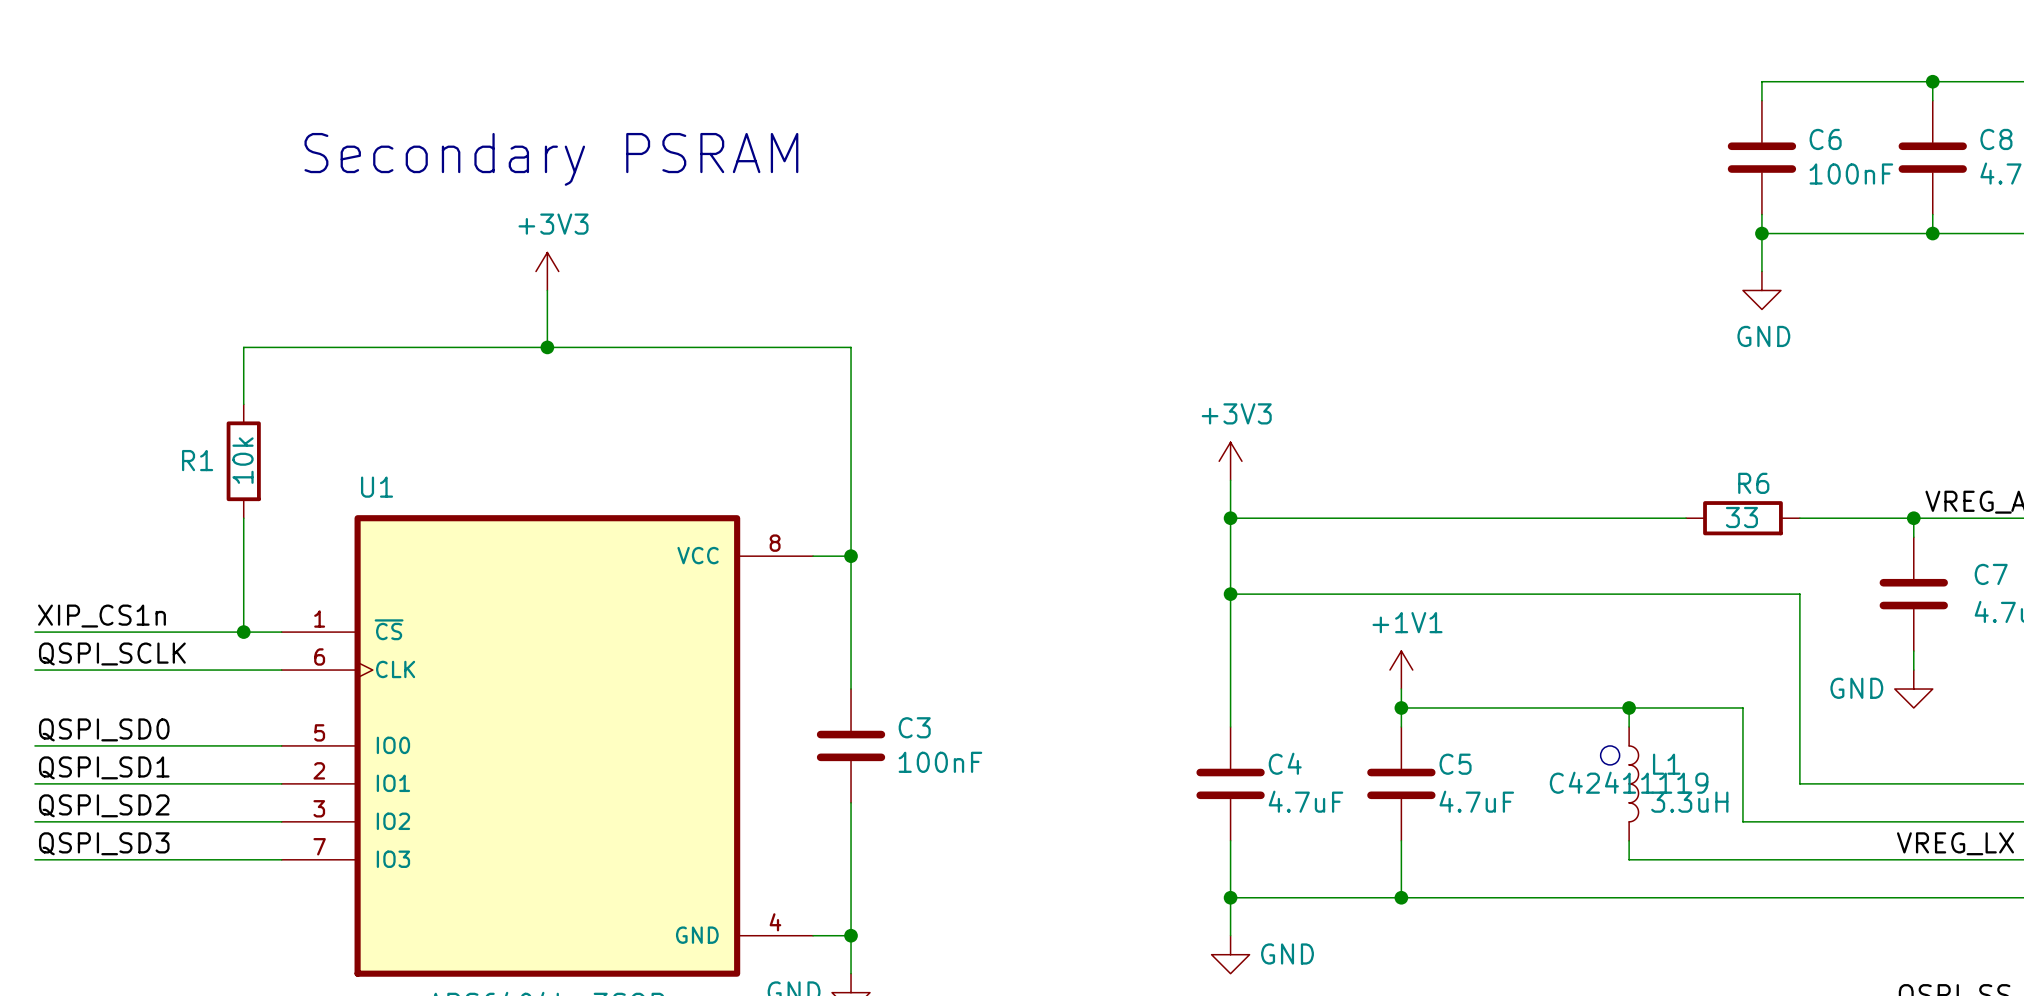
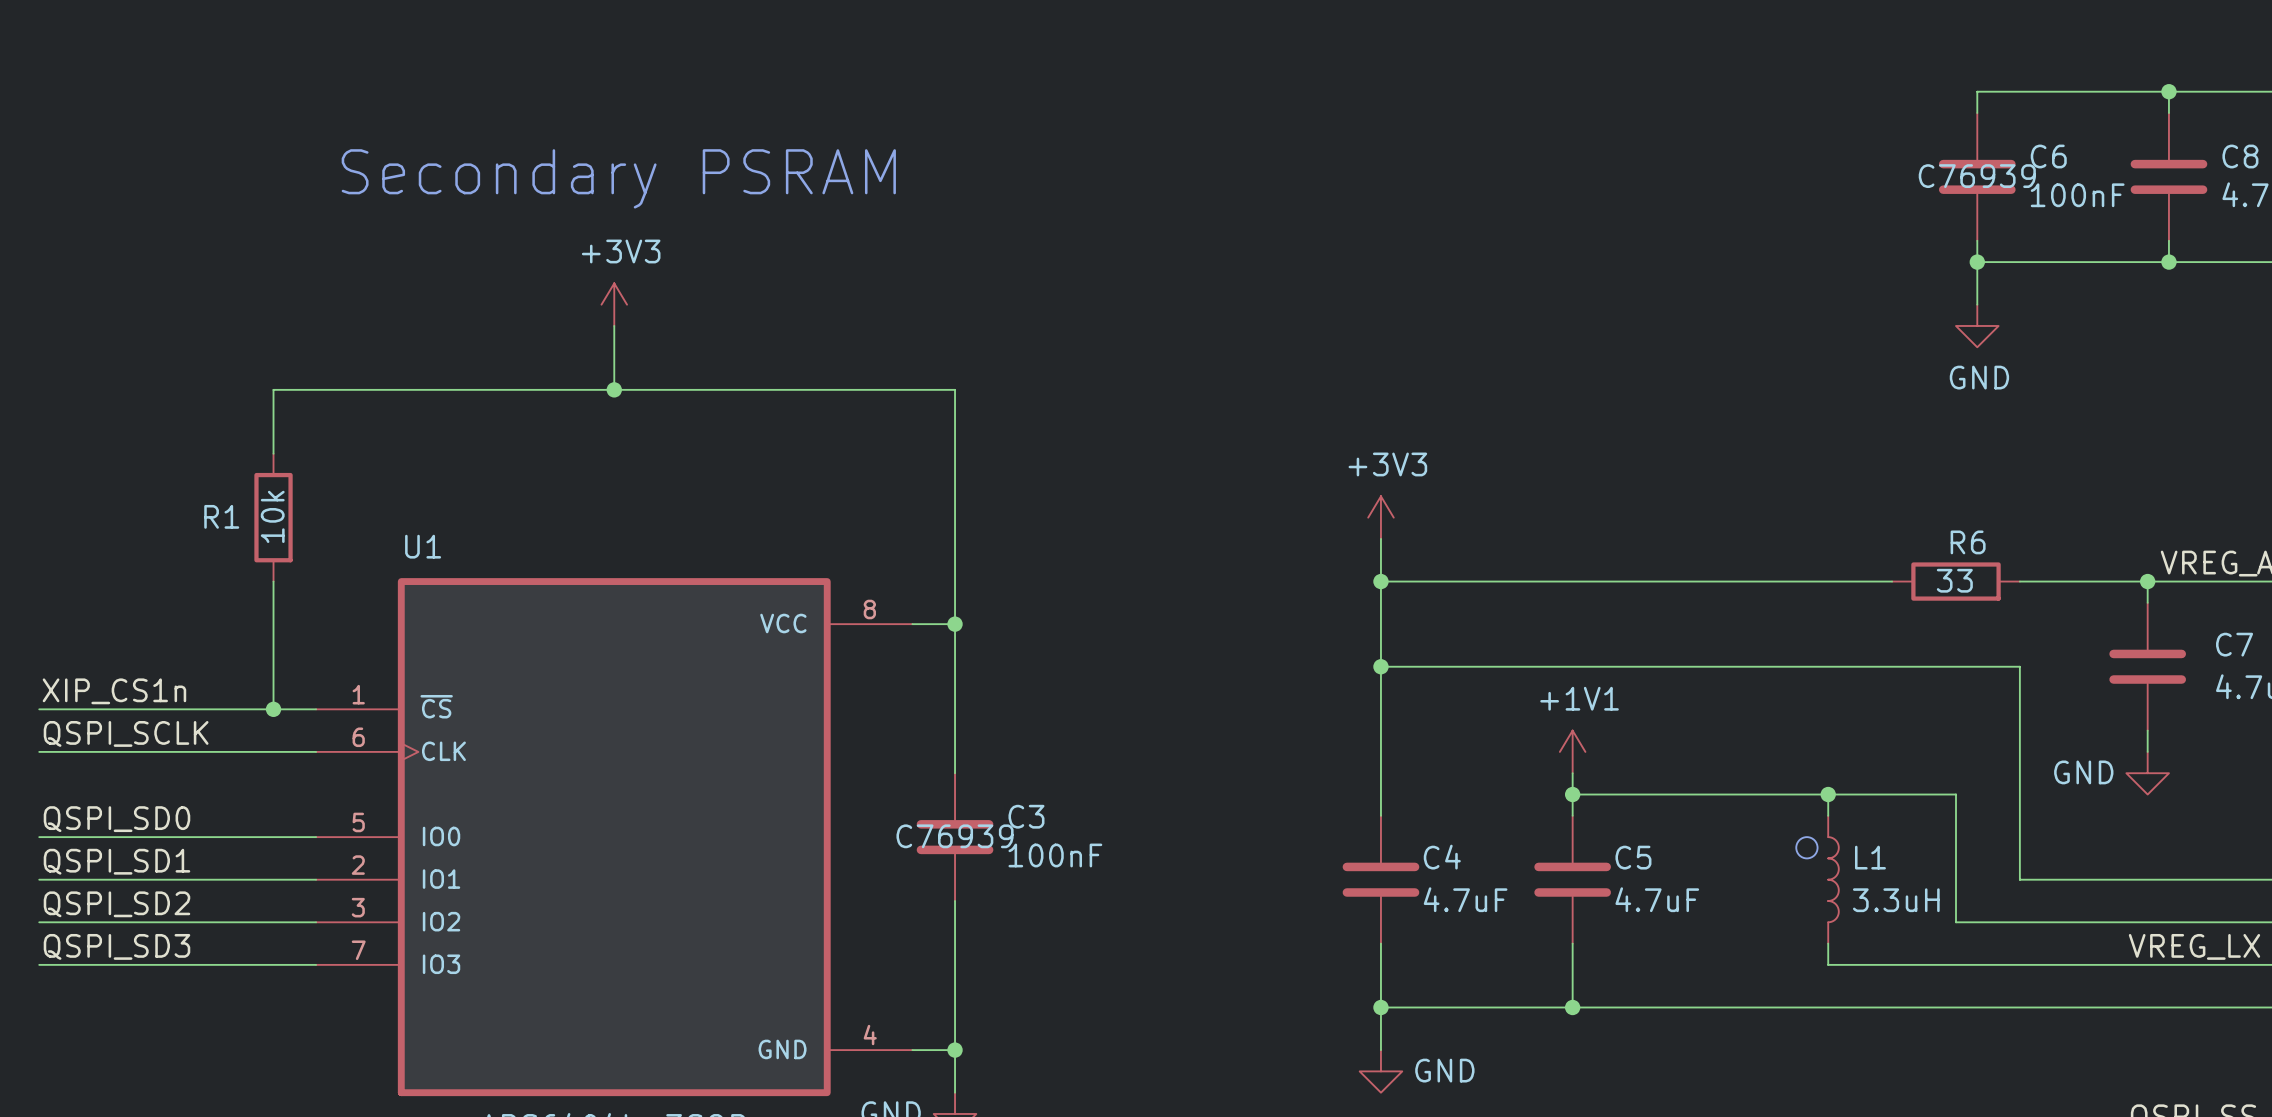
C6 text: none -> C76939 (1977, 176)
C3 text: none -> C76939 (955, 836)
L1 text: C42411119 (1629, 782) -> none

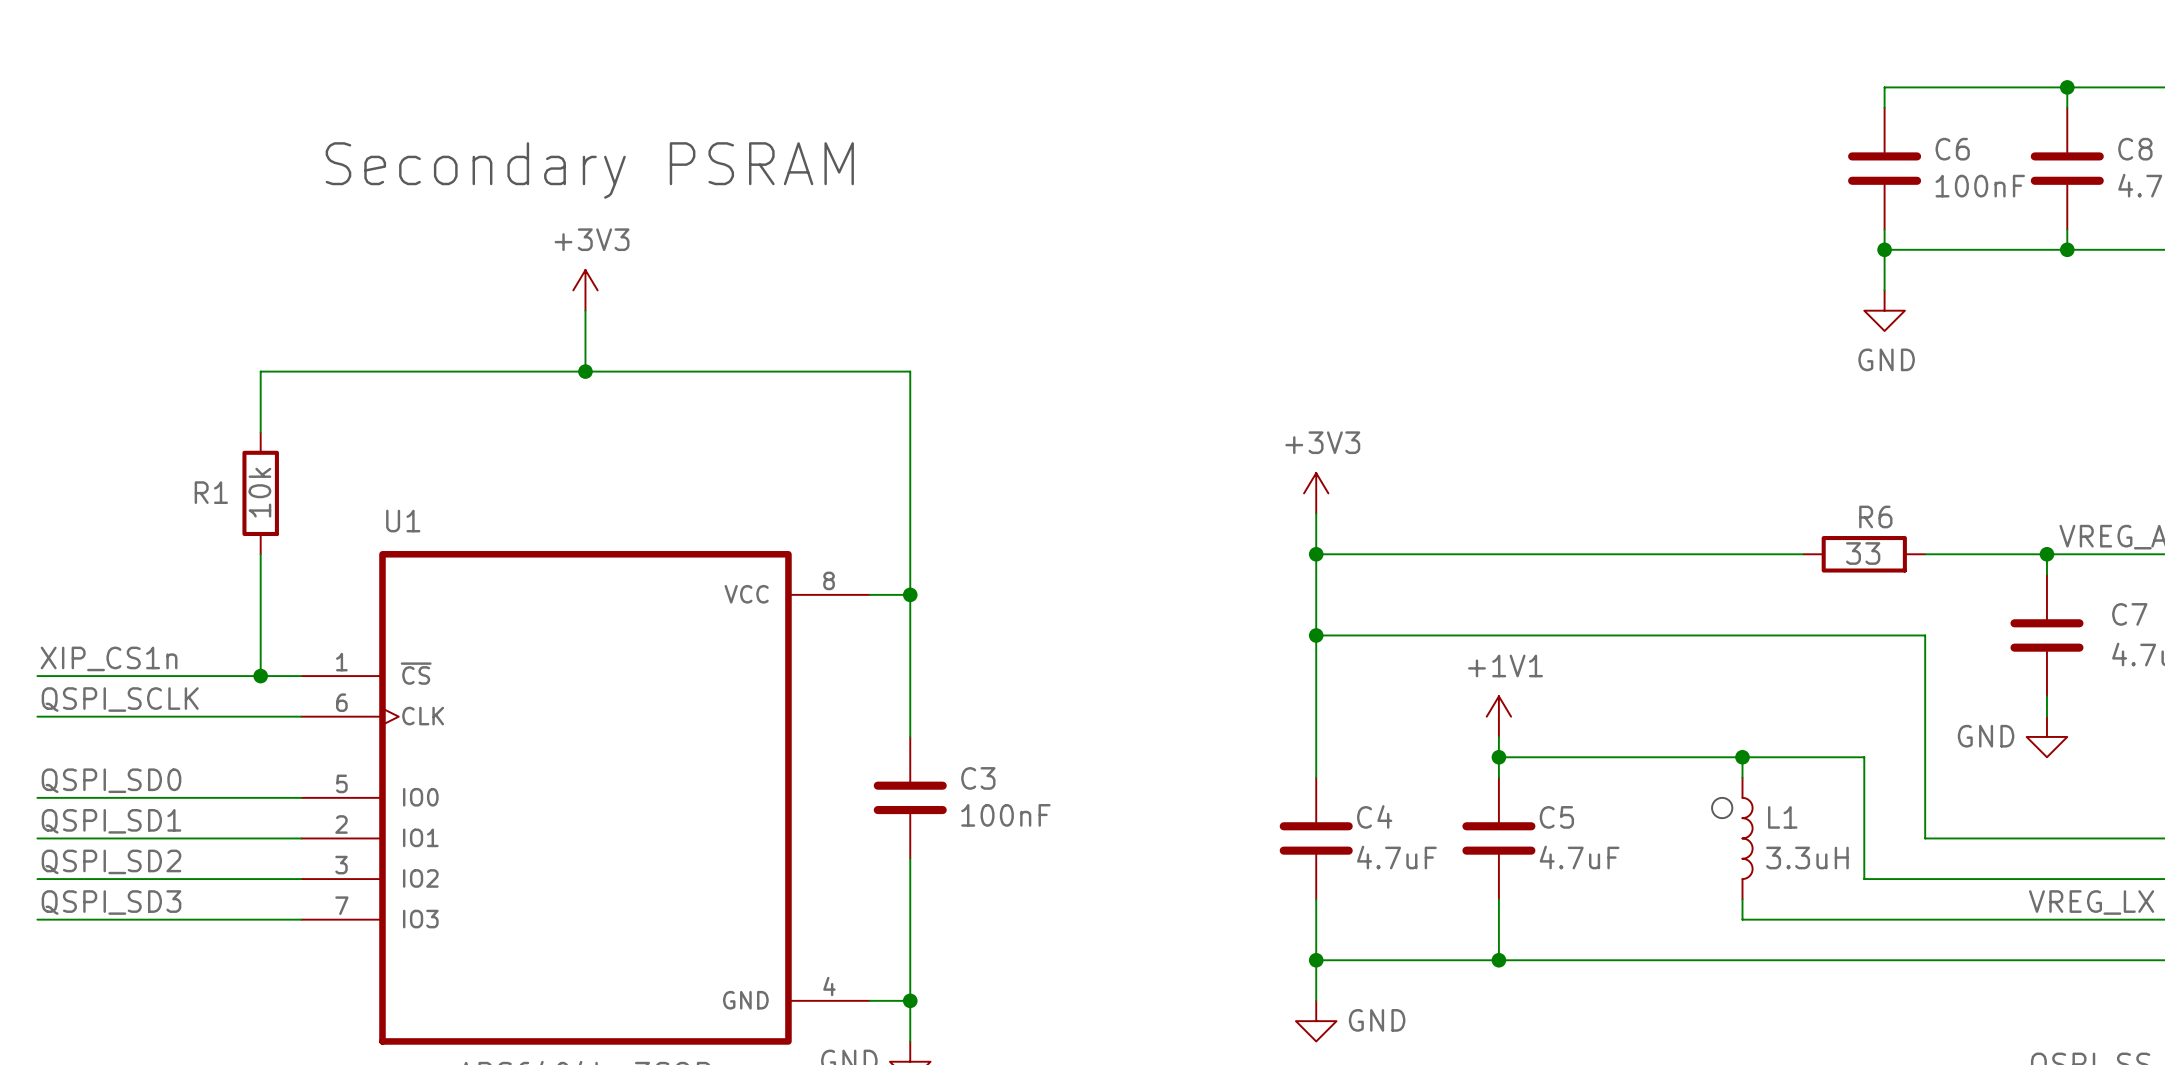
C6 text: C76939 (1977, 176) -> none
C3 text: C76939 (955, 836) -> none

